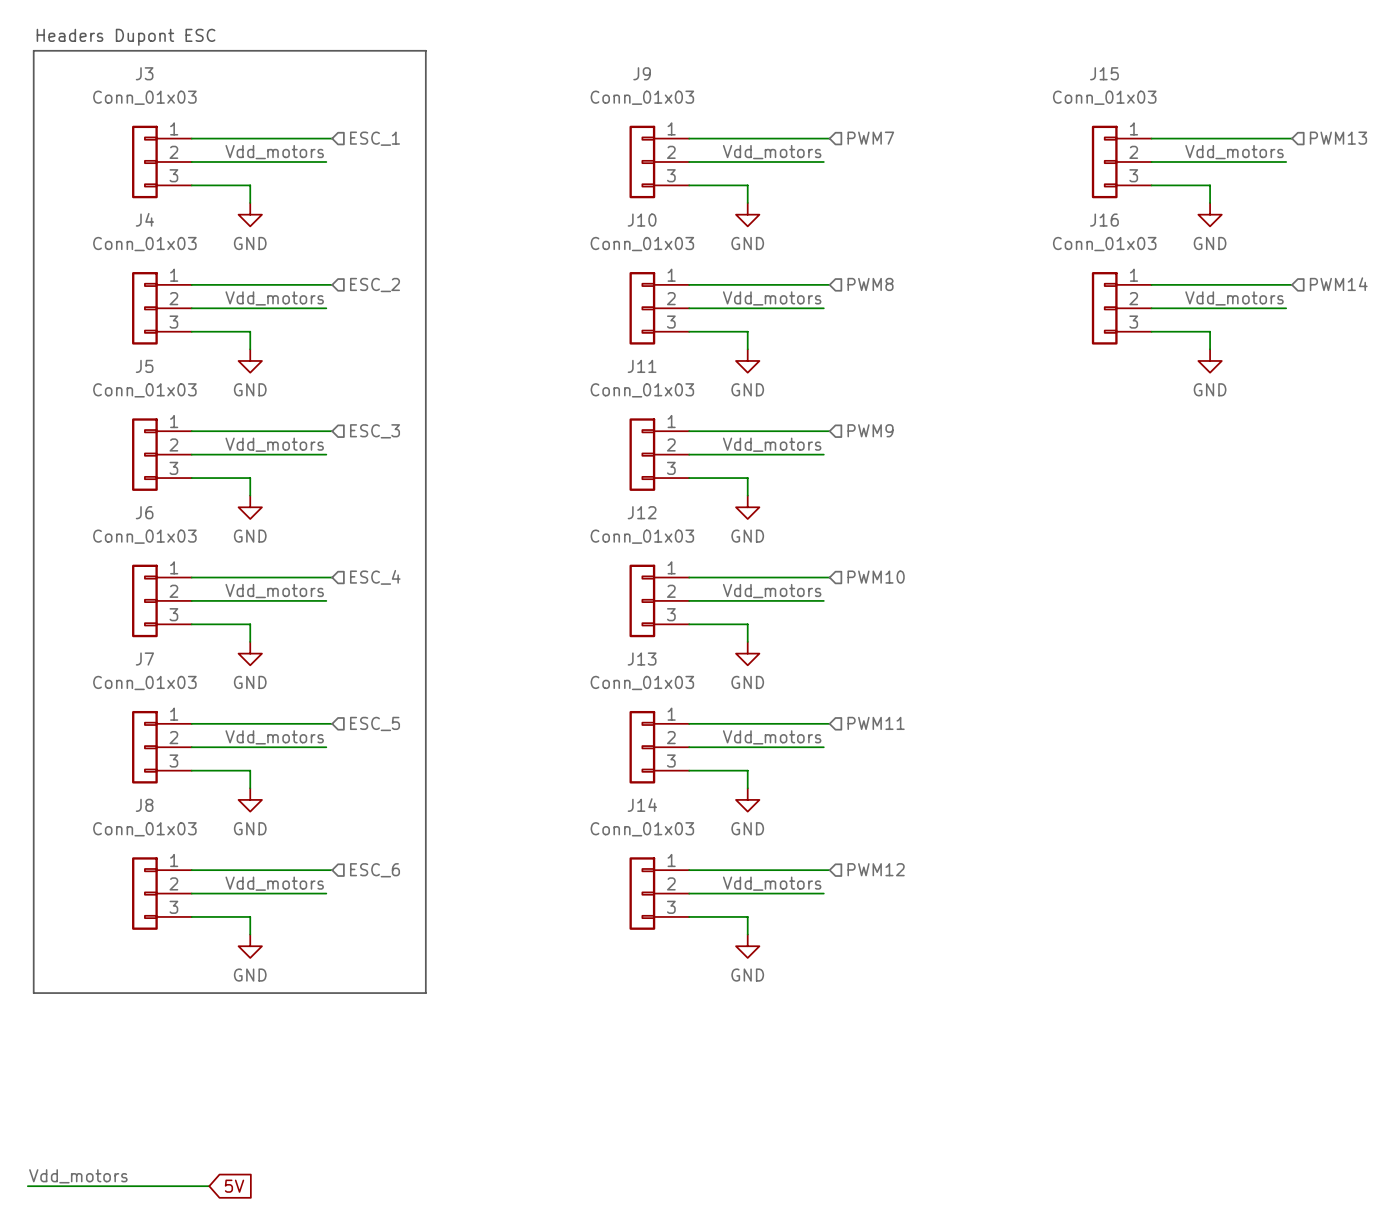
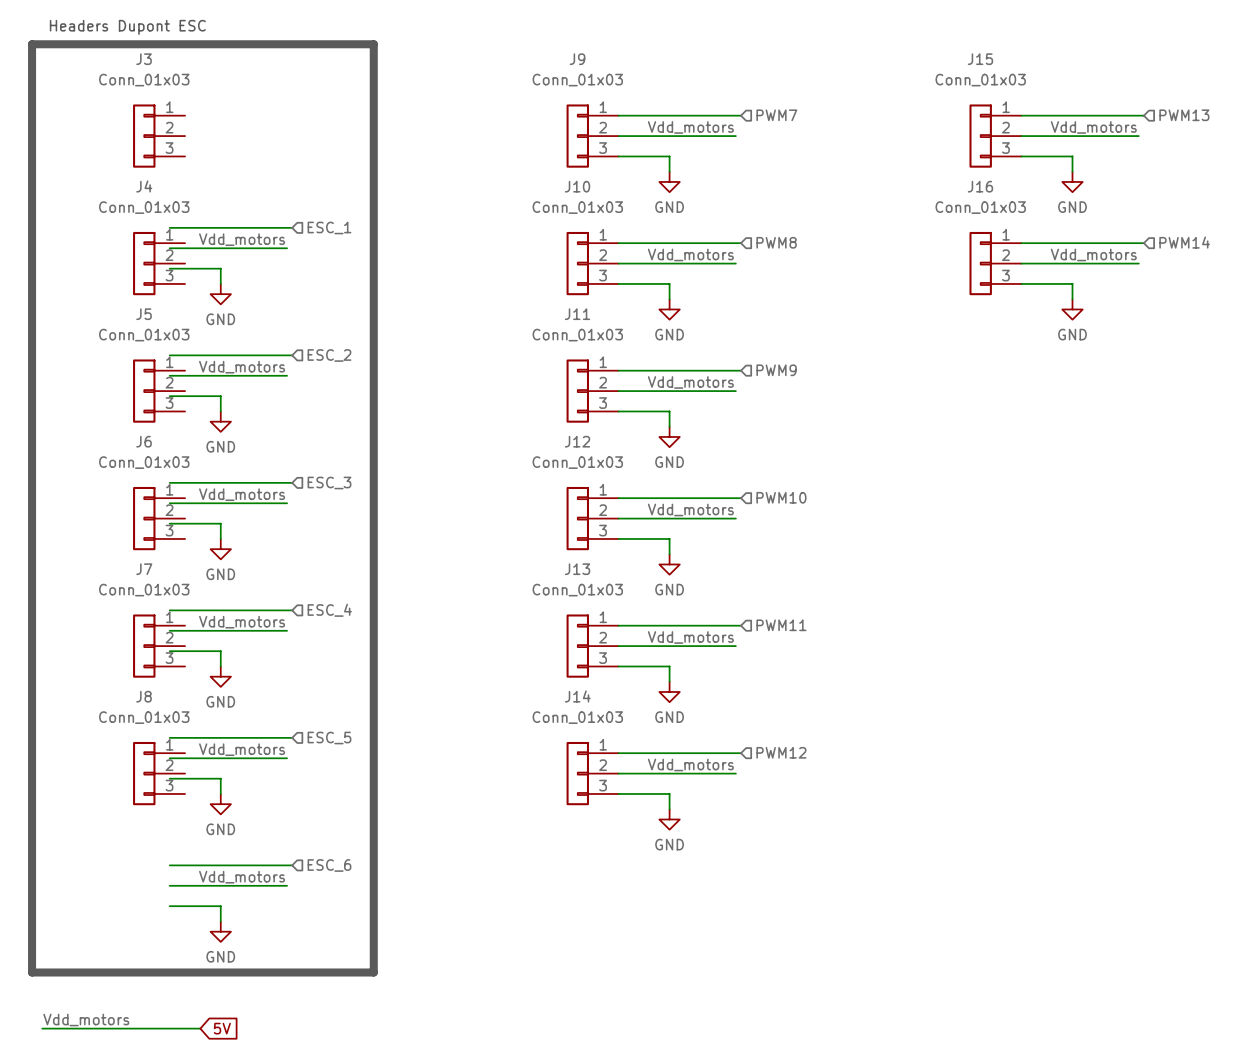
line: (33, 50) (33, 993) (425, 993) (425, 50) (33, 50) -> (32, 44) (32, 972) (373, 972) (373, 44) (32, 44)
wire: (191, 138) (332, 138) -> (169, 227) (292, 227)
hierarchical label position: ESC_1 (375, 138) -> ESC_1 (329, 227)
label: Vdd_motors (274, 152) -> none
wire: (191, 161) (326, 161) -> (169, 248) (287, 248)
wire: (191, 185) (250, 185) (250, 202) -> (169, 268) (220, 268) (220, 283)
power symbol: GND (250, 214) -> none
wire: (191, 284) (332, 284) -> (169, 355) (292, 355)
hierarchical label position: ESC_2 (375, 285) -> ESC_2 (329, 355)
label position: Vdd_motors (274, 298) -> Vdd_motors (242, 239)
wire: (191, 308) (326, 308) -> (169, 375) (287, 375)
wire: (191, 331) (250, 331) (250, 349) -> (169, 396) (220, 396) (220, 411)
power symbol position: GND (250, 360) -> GND (220, 294)
wire: (191, 431) (332, 431) -> (169, 482) (292, 482)
hierarchical label position: ESC_3 (375, 431) -> ESC_3 (329, 482)
label position: Vdd_motors (274, 444) -> Vdd_motors (242, 367)
wire: (191, 454) (326, 454) -> (169, 503) (287, 503)
wire: (191, 478) (250, 478) (250, 495) -> (169, 523) (220, 523) (220, 538)
power symbol position: GND (250, 507) -> GND (220, 421)
wire: (191, 577) (332, 577) -> (169, 610) (292, 610)
hierarchical label position: ESC_4 (375, 577) -> ESC_4 (329, 610)
label position: Vdd_motors (274, 591) -> Vdd_motors (242, 494)
wire: (191, 600) (326, 600) -> (169, 630) (287, 630)
wire: (191, 624) (250, 624) (250, 641) -> (169, 651) (220, 651) (220, 666)
power symbol position: GND (250, 653) -> GND (220, 549)
wire: (191, 723) (332, 723) -> (169, 737) (292, 737)
hierarchical label position: ESC_5 (375, 723) -> ESC_5 (329, 737)
label position: Vdd_motors (274, 737) -> Vdd_motors (242, 622)
wire: (191, 747) (326, 747) -> (169, 758) (287, 758)
wire: (191, 770) (250, 770) (250, 788) -> (169, 778) (220, 778) (220, 793)
power symbol position: GND (250, 799) -> GND (220, 676)
wire: (191, 870) (332, 870) -> (169, 865) (292, 865)
hierarchical label position: ESC_6 (375, 870) -> ESC_6 (329, 865)
label position: Vdd_motors (274, 883) -> Vdd_motors (242, 749)
wire: (191, 893) (326, 893) -> (169, 885) (287, 885)
wire: (191, 916) (250, 916) (250, 934) -> (169, 906) (220, 906) (220, 921)
power symbol position: GND (250, 946) -> GND (220, 804)
label: none -> Vdd_motors (242, 877)
power symbol: none -> GND (220, 931)

